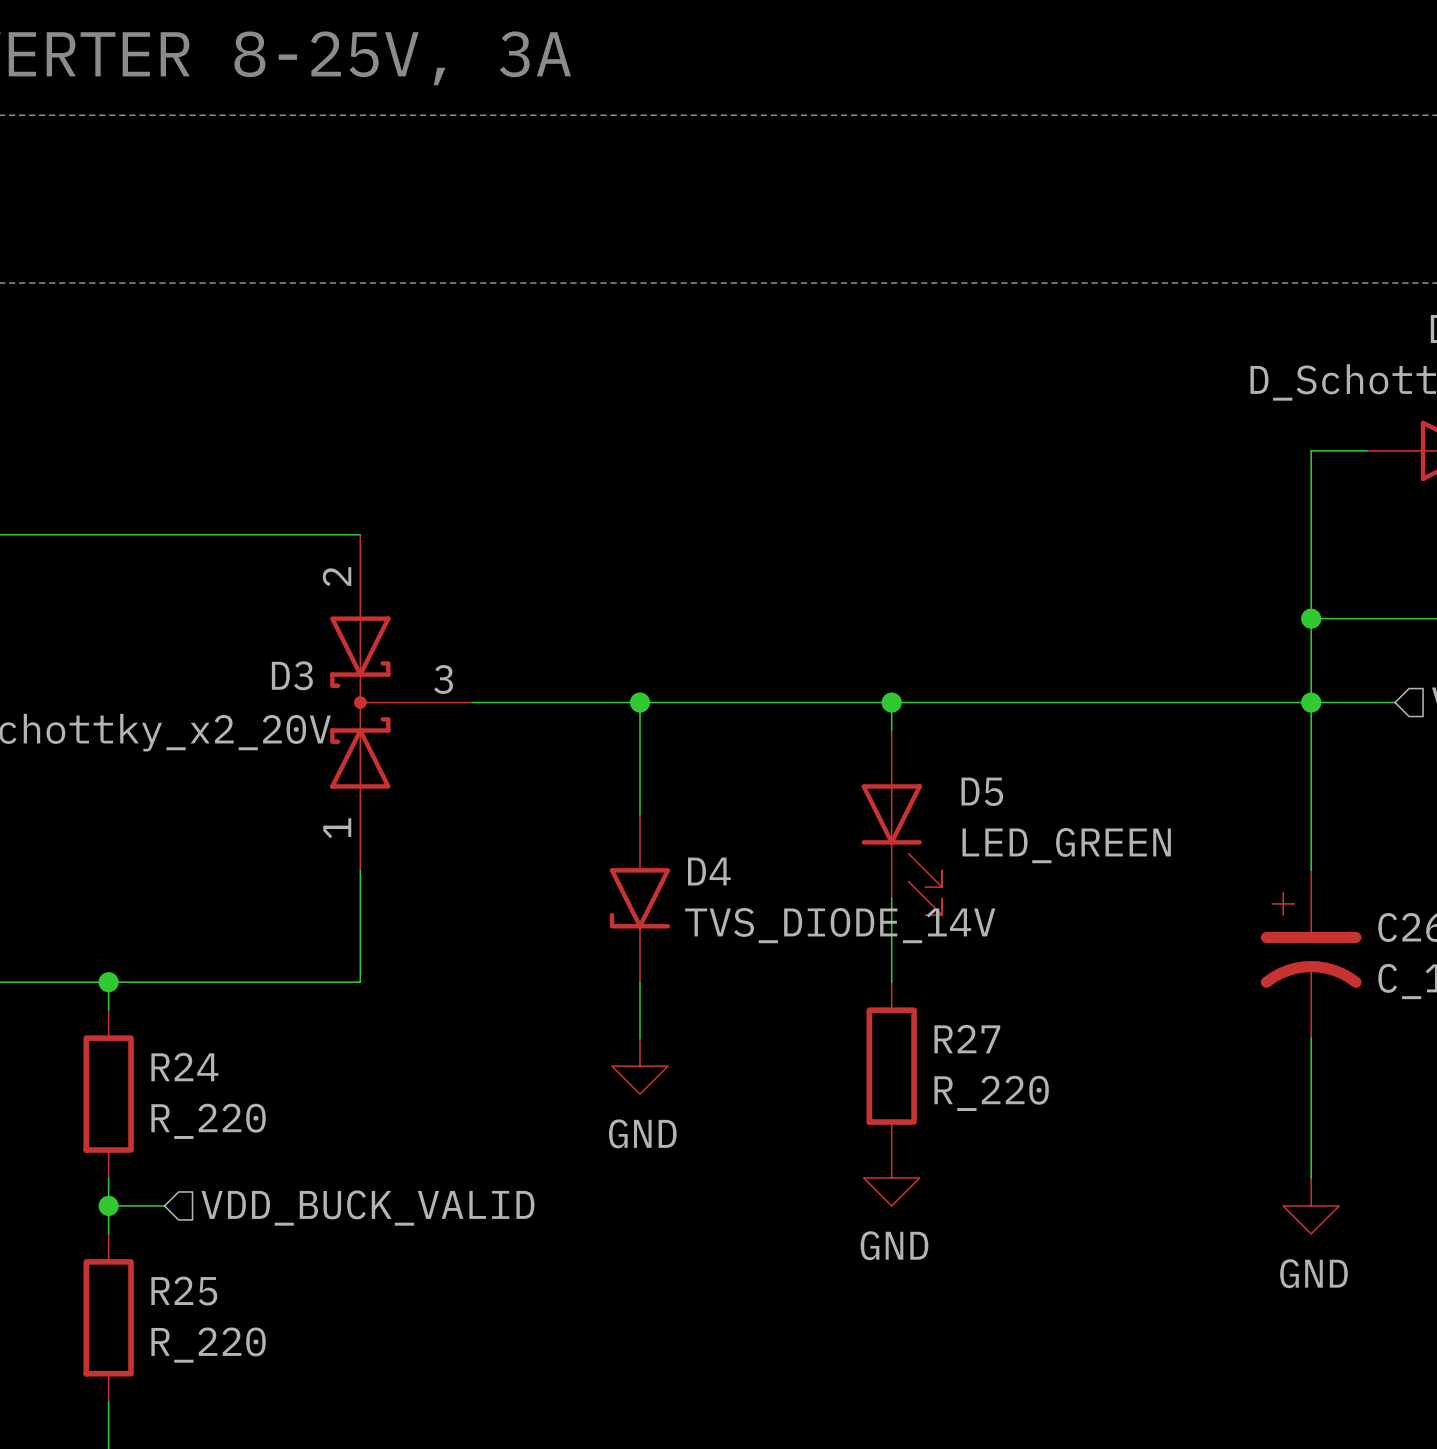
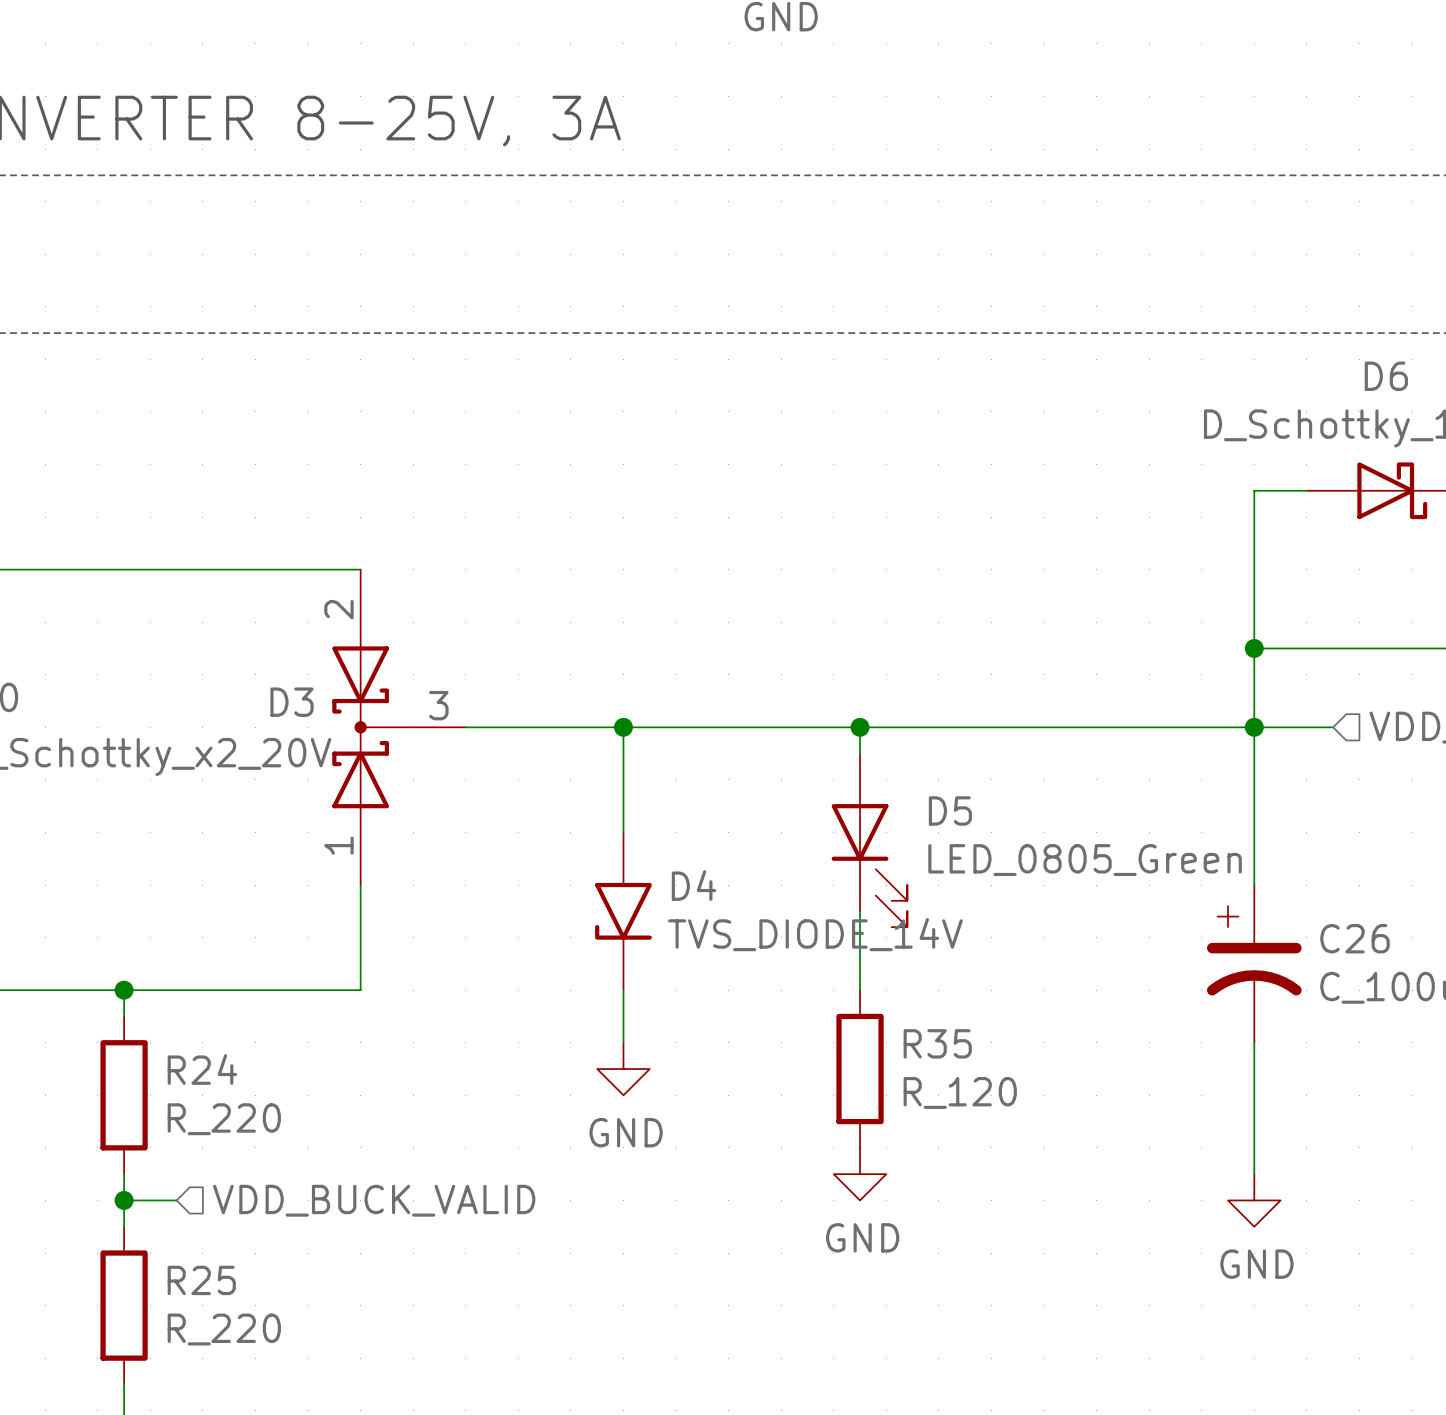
D5 value: LED_GREEN (1066, 845) -> LED_0805_Green (1085, 860)
R27 name: R27 (967, 1039) -> R35 (937, 1043)
R27 value: R_220 (991, 1093) -> R_120 (960, 1092)

